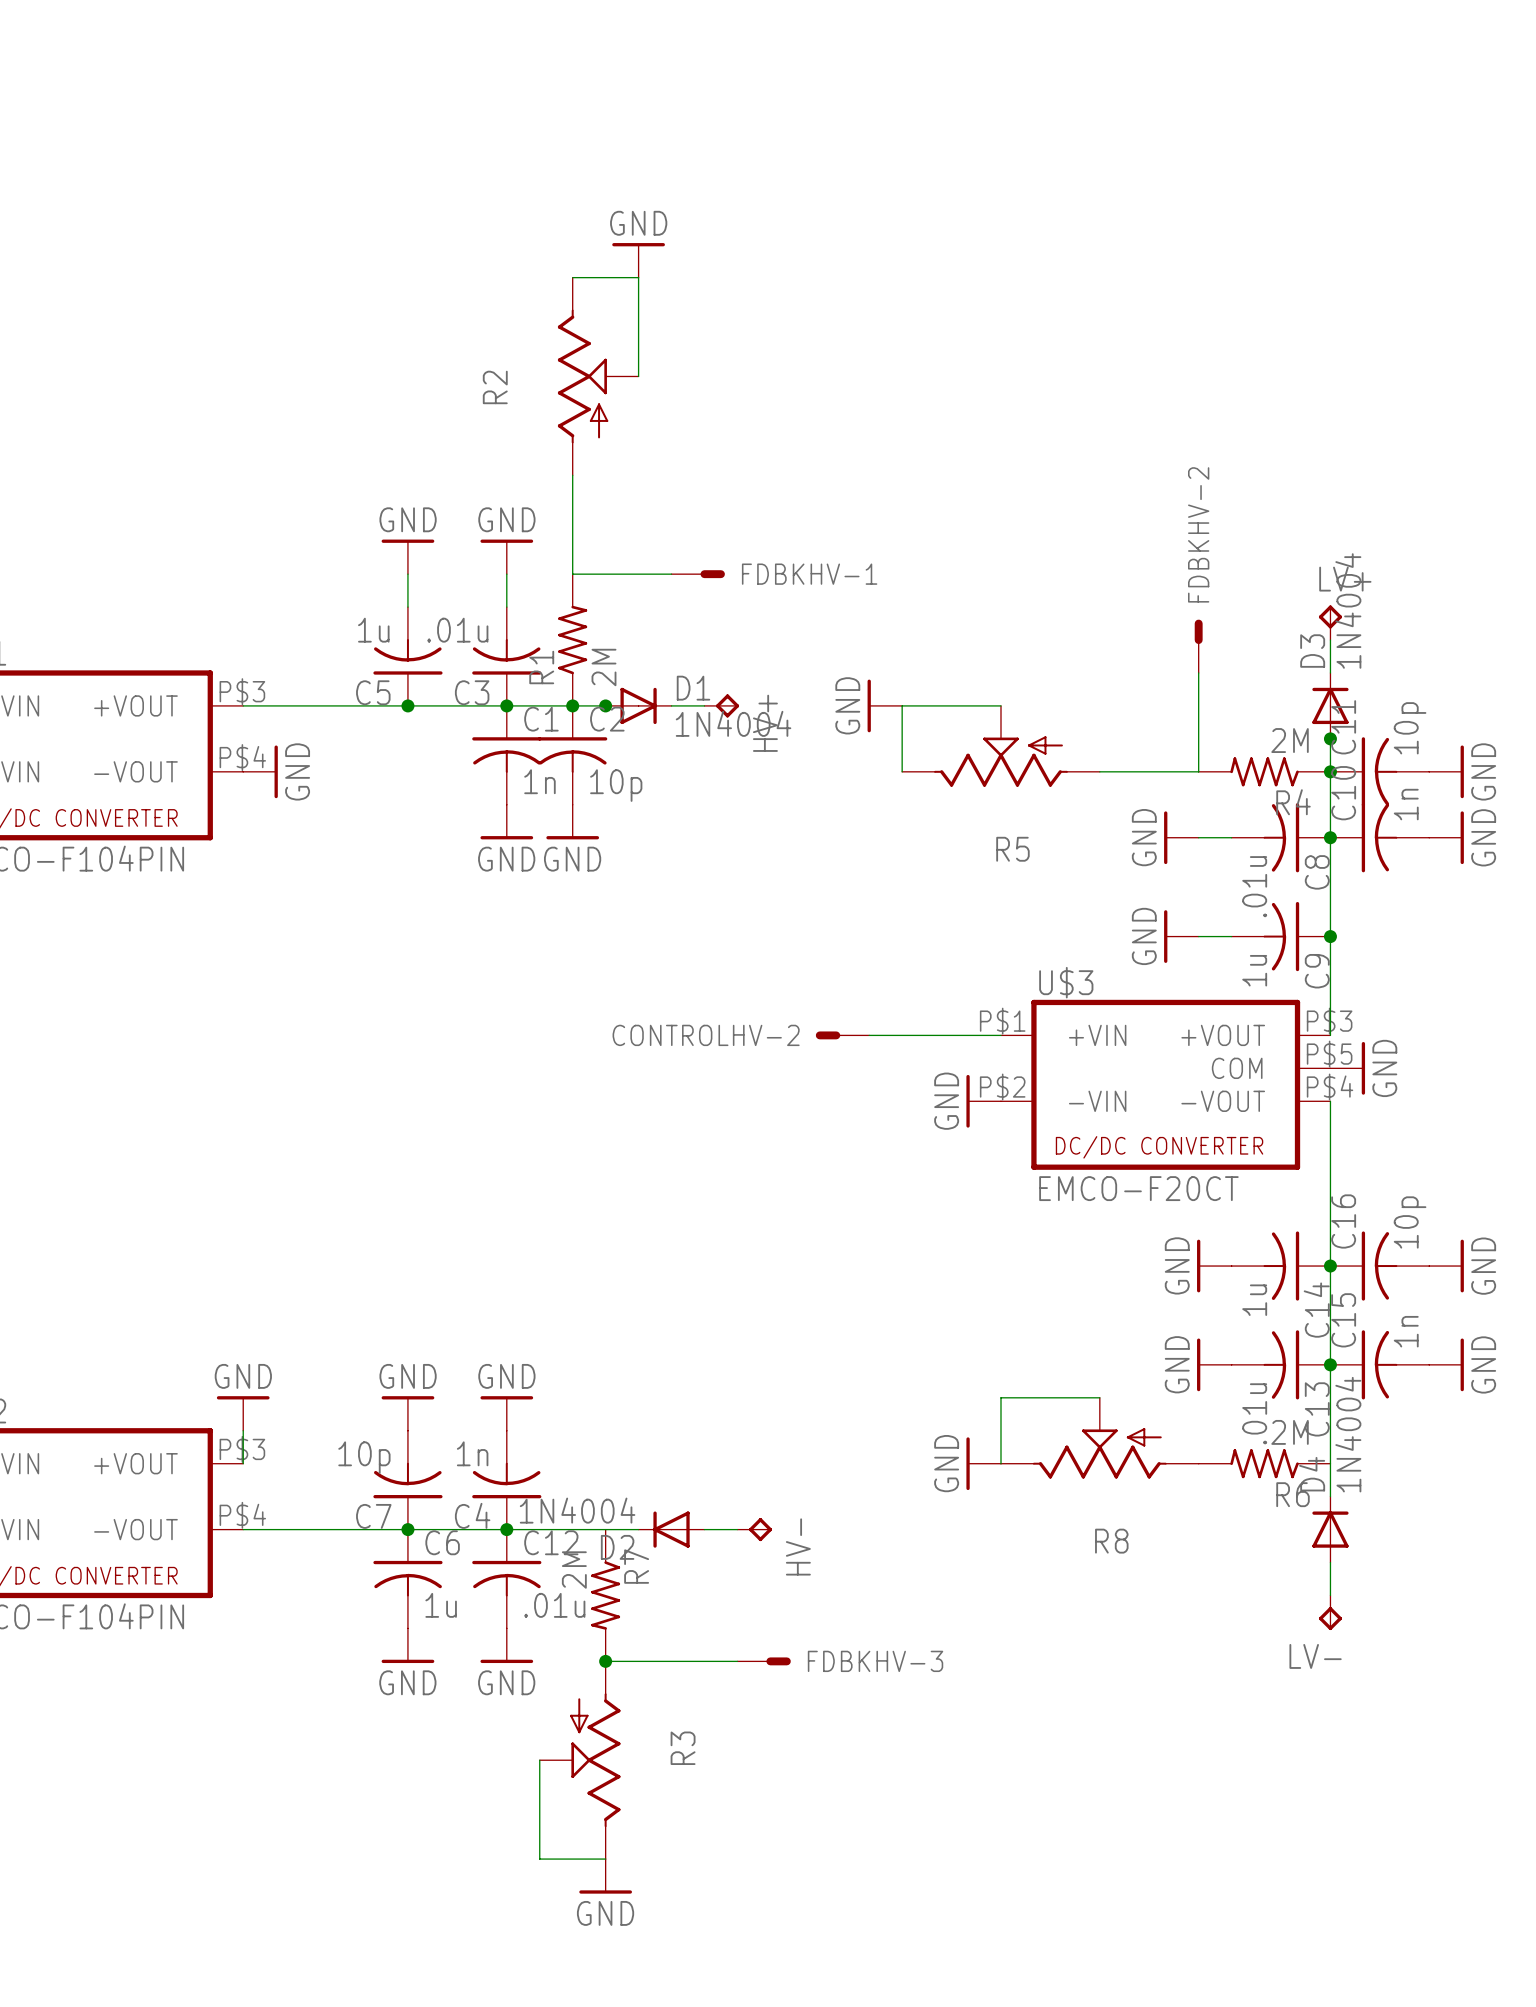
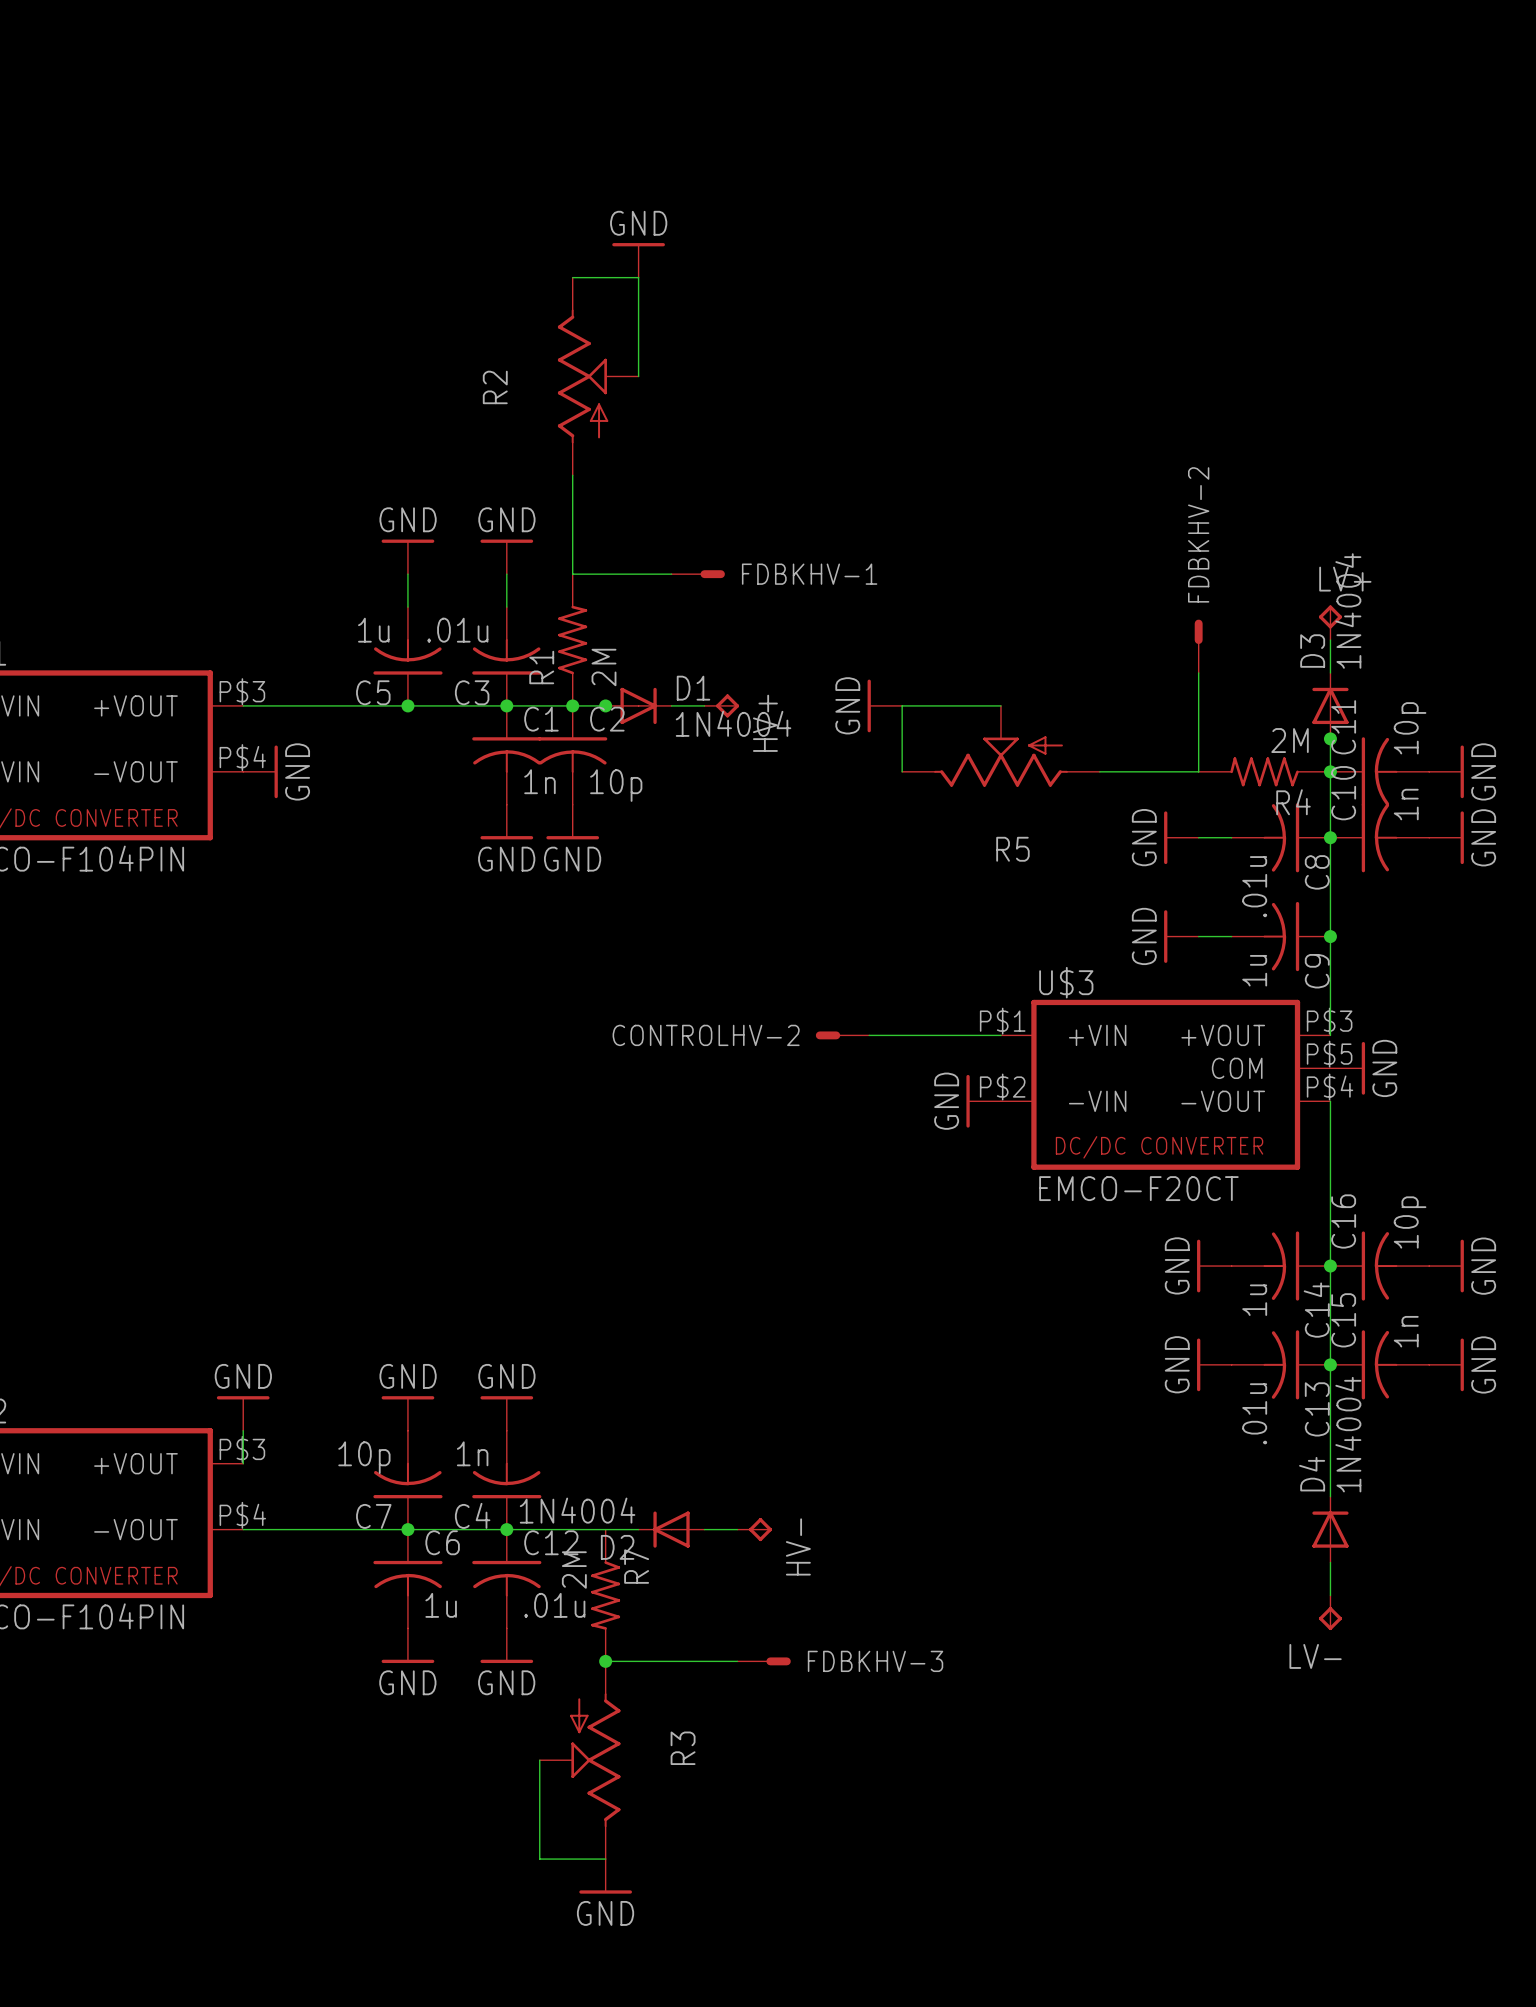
wire: (1099, 1397) (1000, 1397) (1000, 1463) -> none
R8: (1099, 1438) -> none
power symbol: GND (983, 1463) -> none
R6: 2M (1264, 1463) -> none

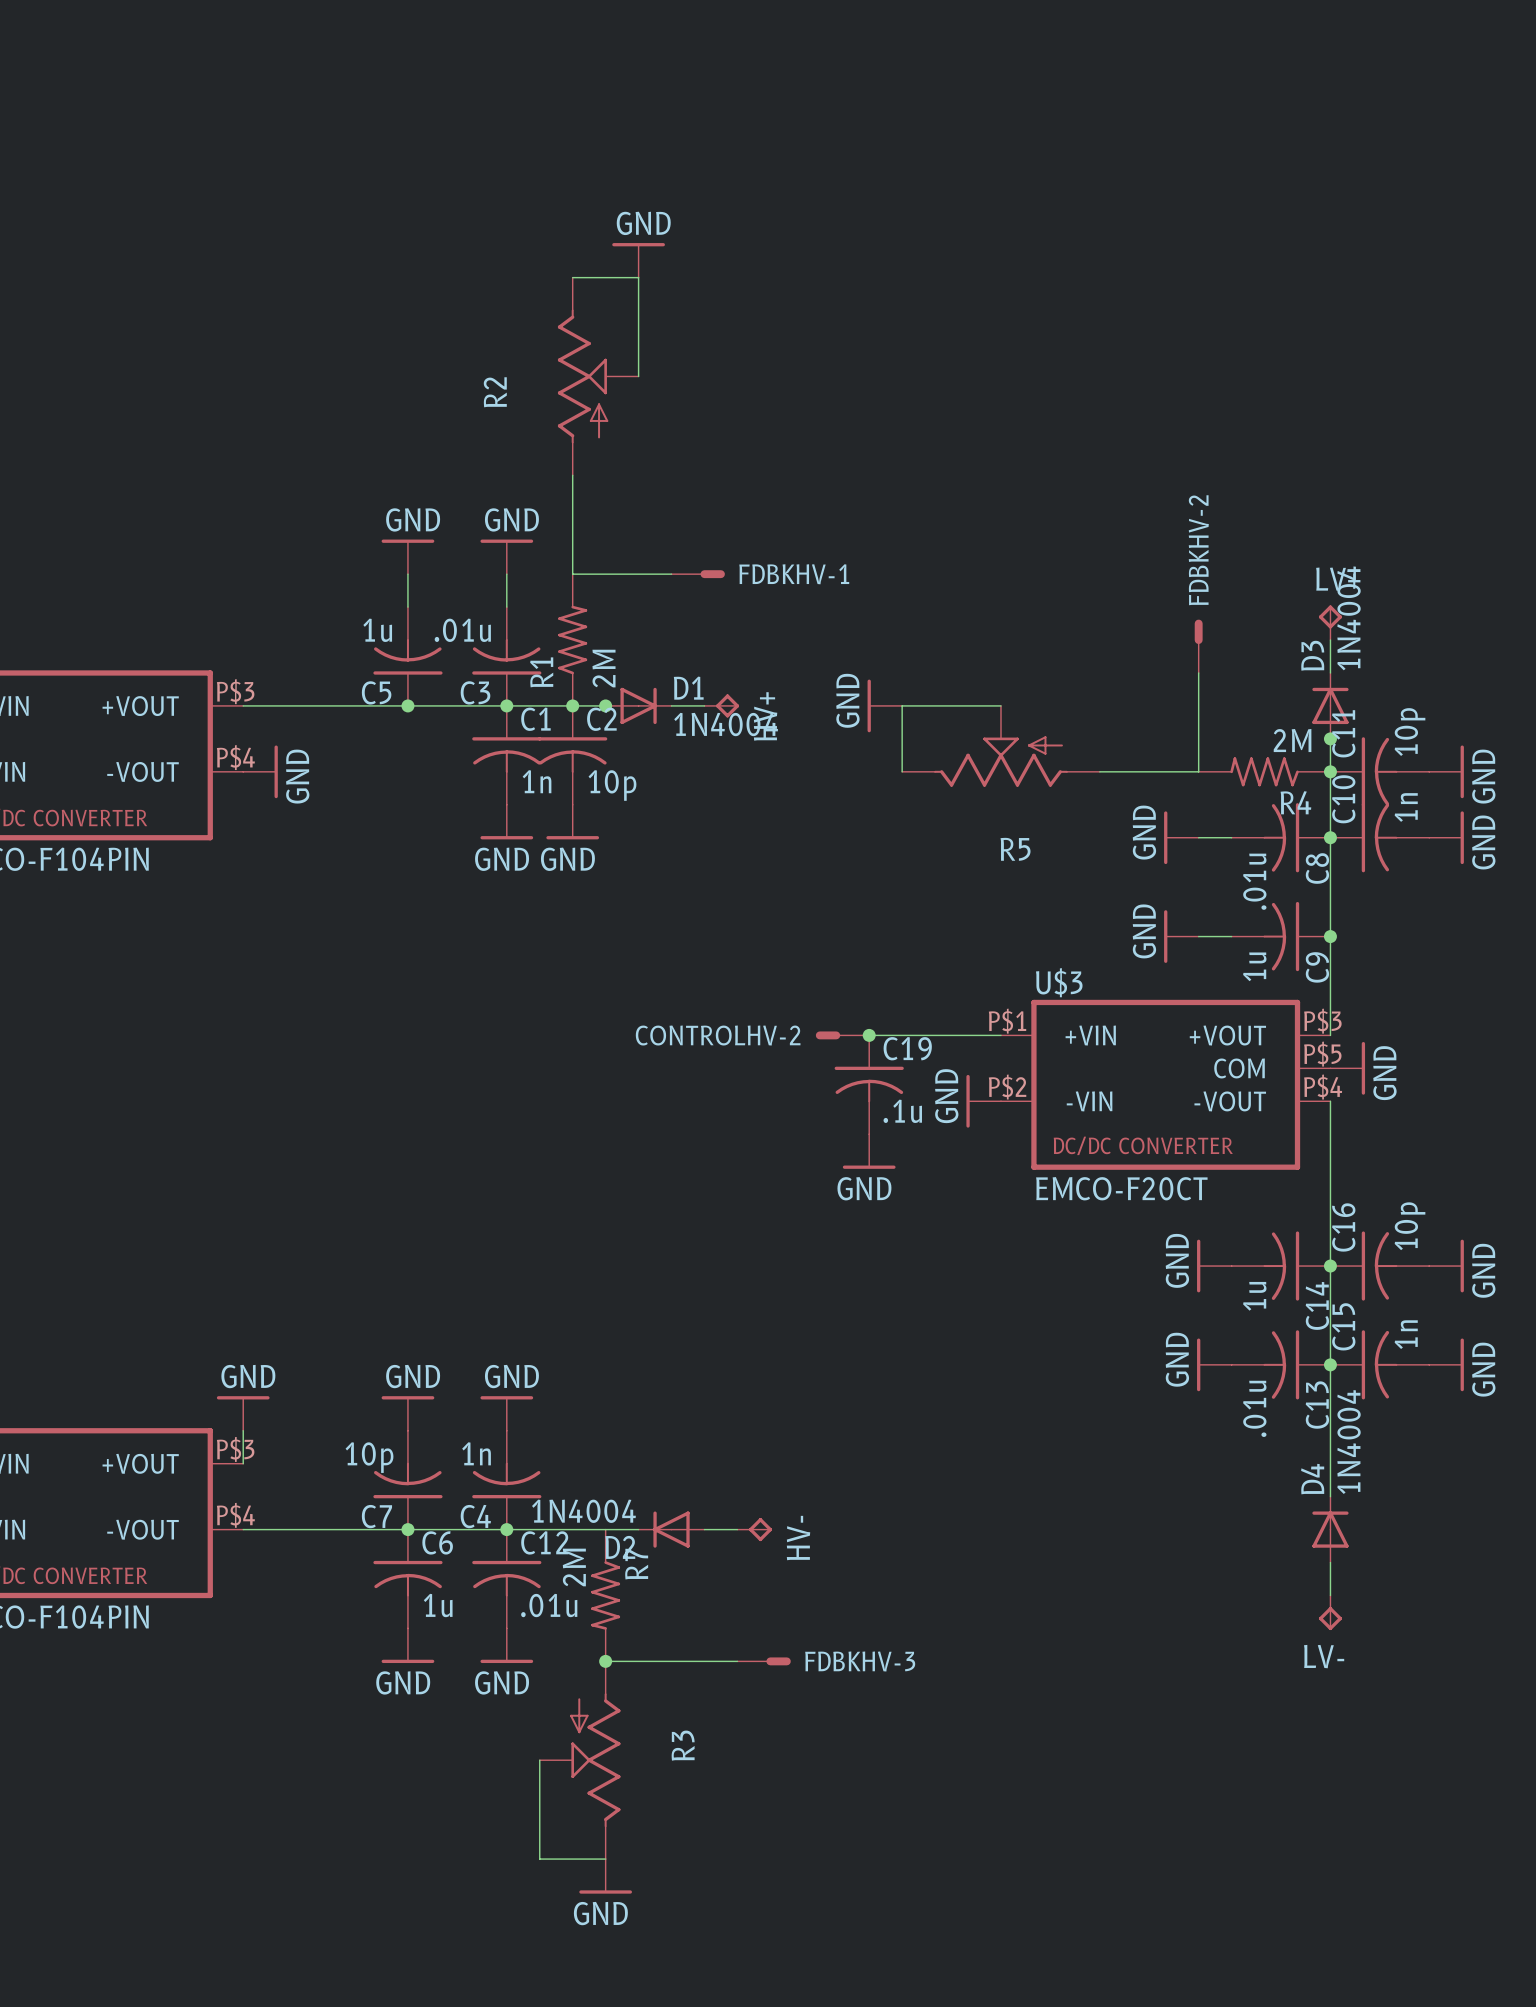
junction: none -> (869, 1035)
C19: none -> .1u (869, 1084)
power symbol: none -> GND (869, 1151)

